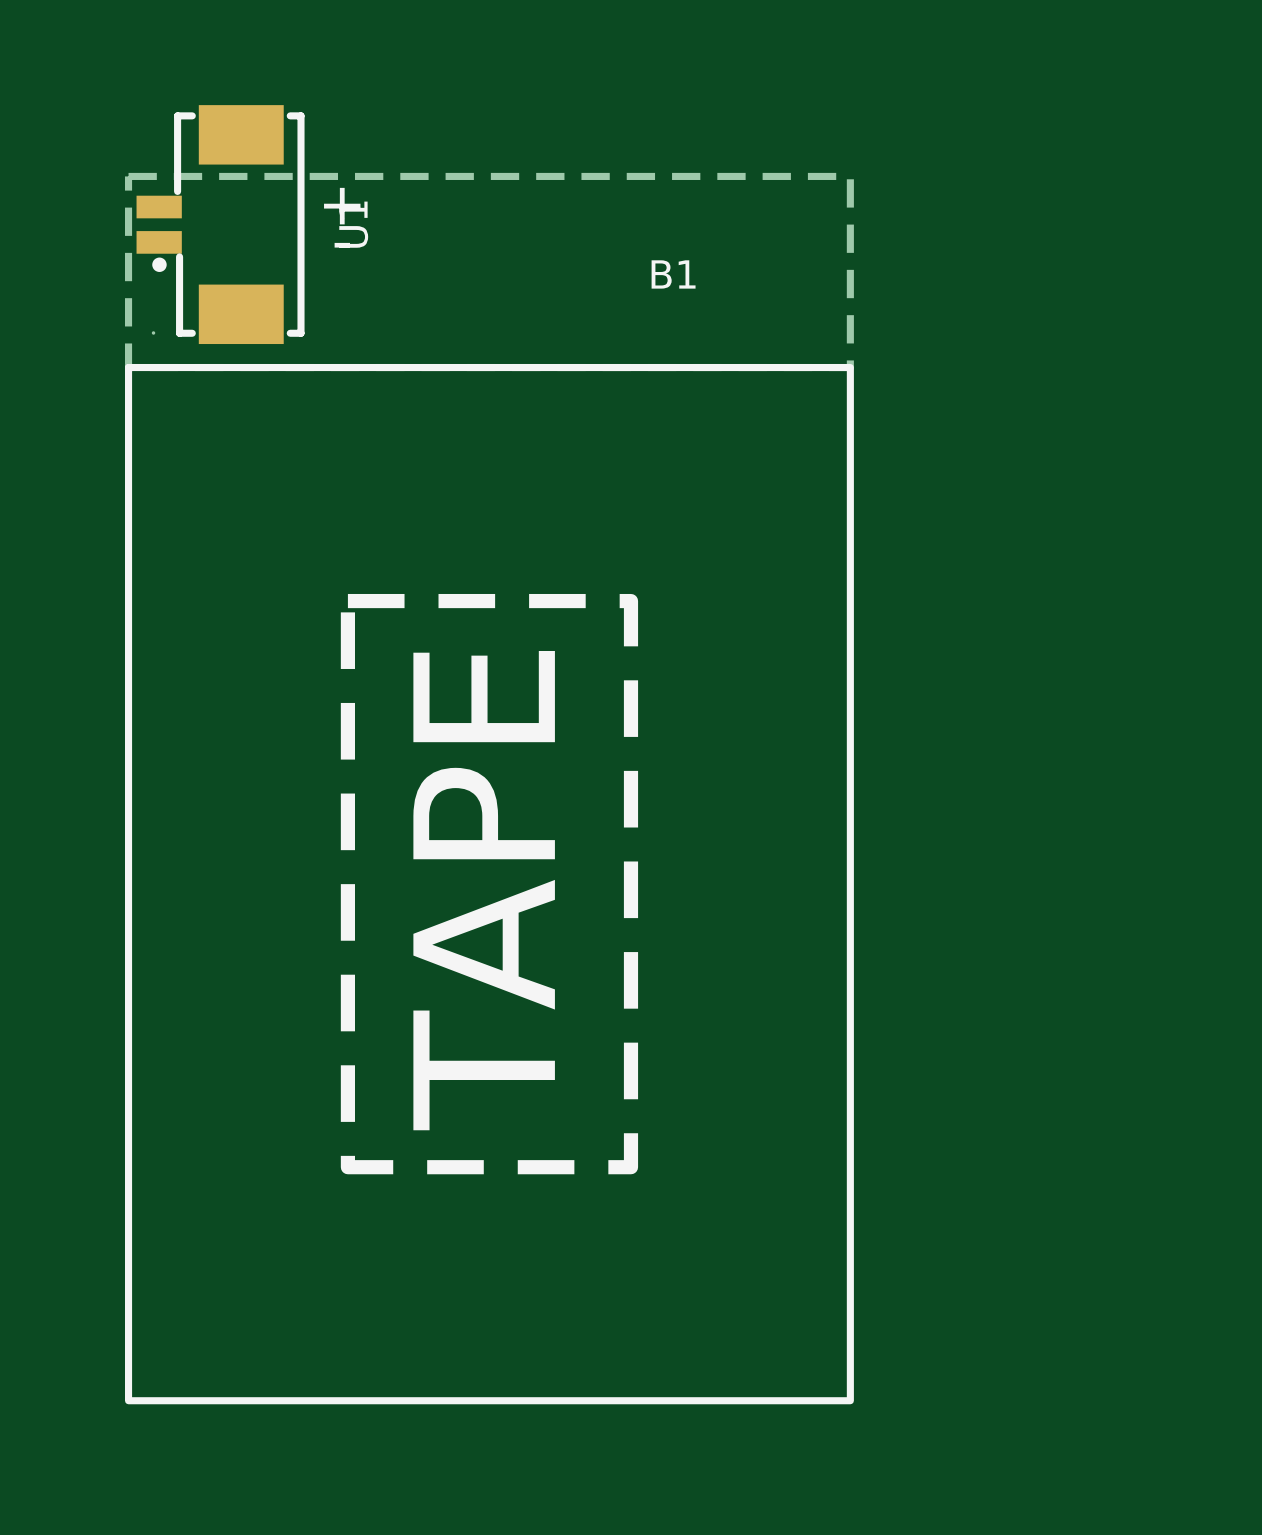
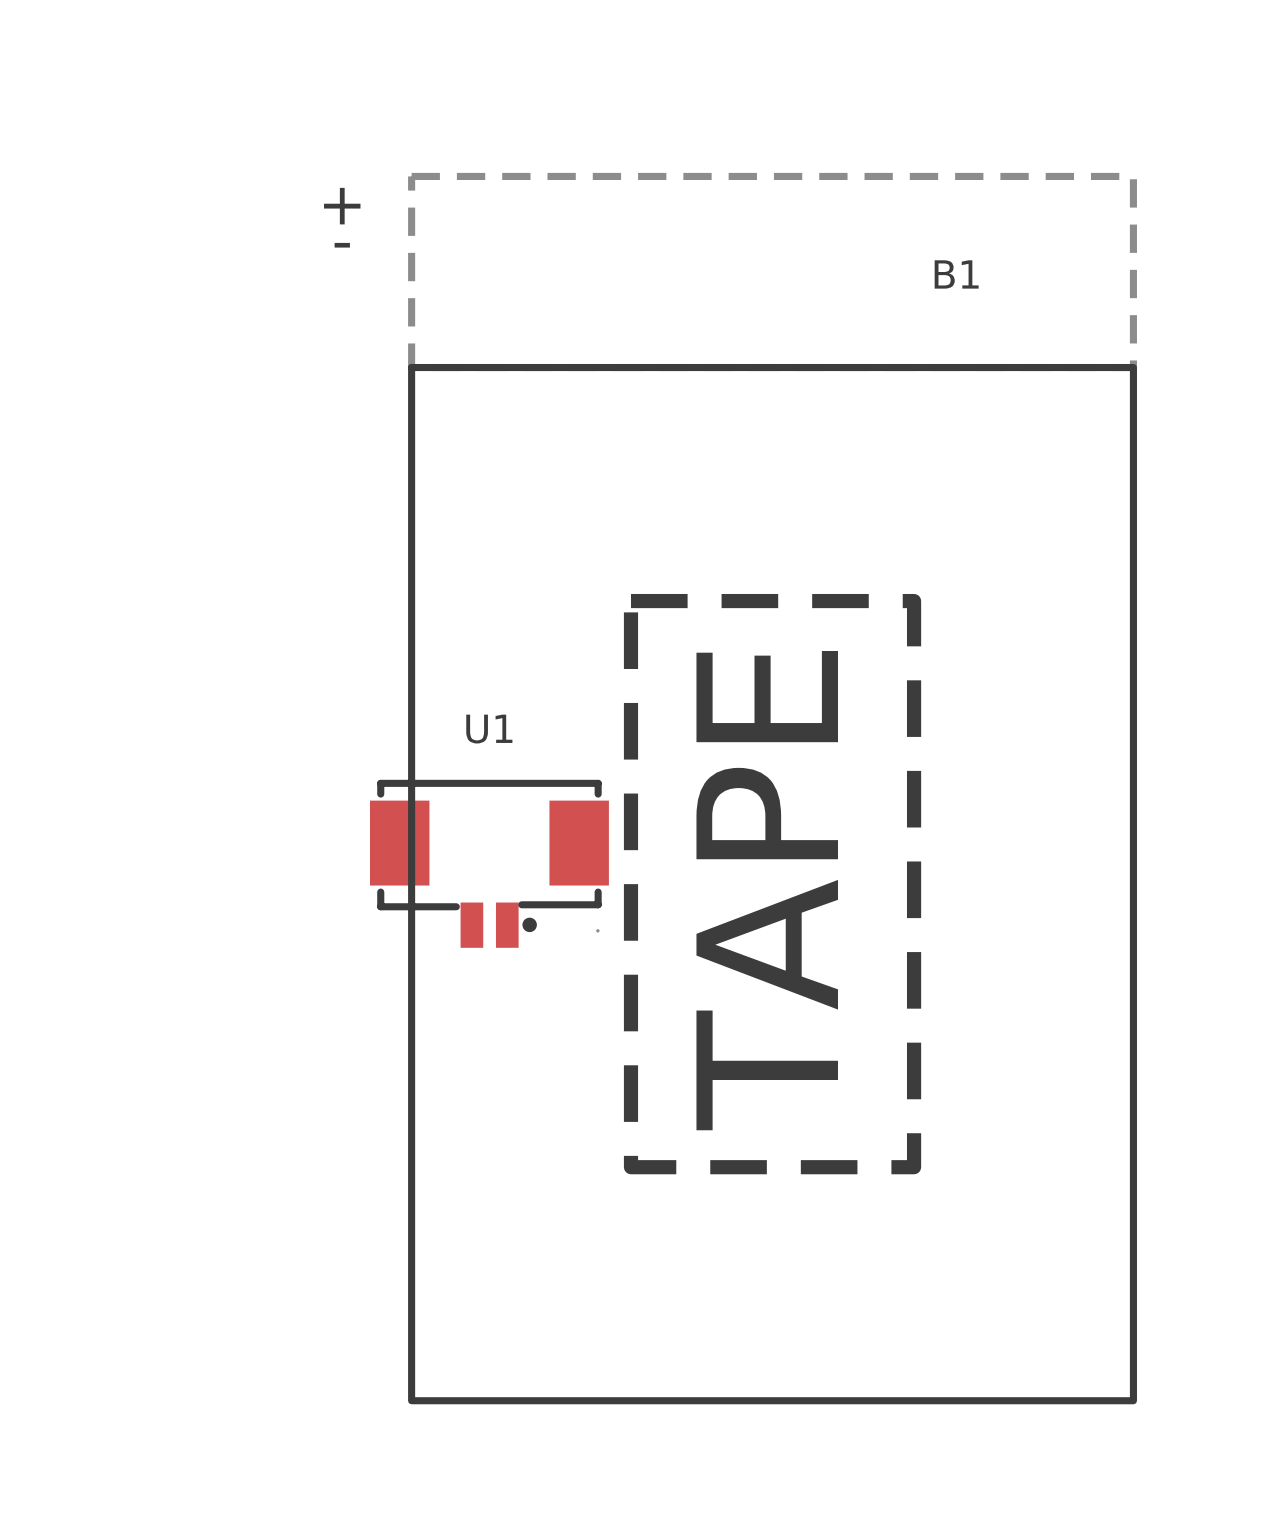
U1 rotation: 0° (220, 224) -> 90° counterclockwise (489, 863)
U1 position: (220, 224) -> (489, 863)
B1 position: (489, 788) -> (772, 788)

